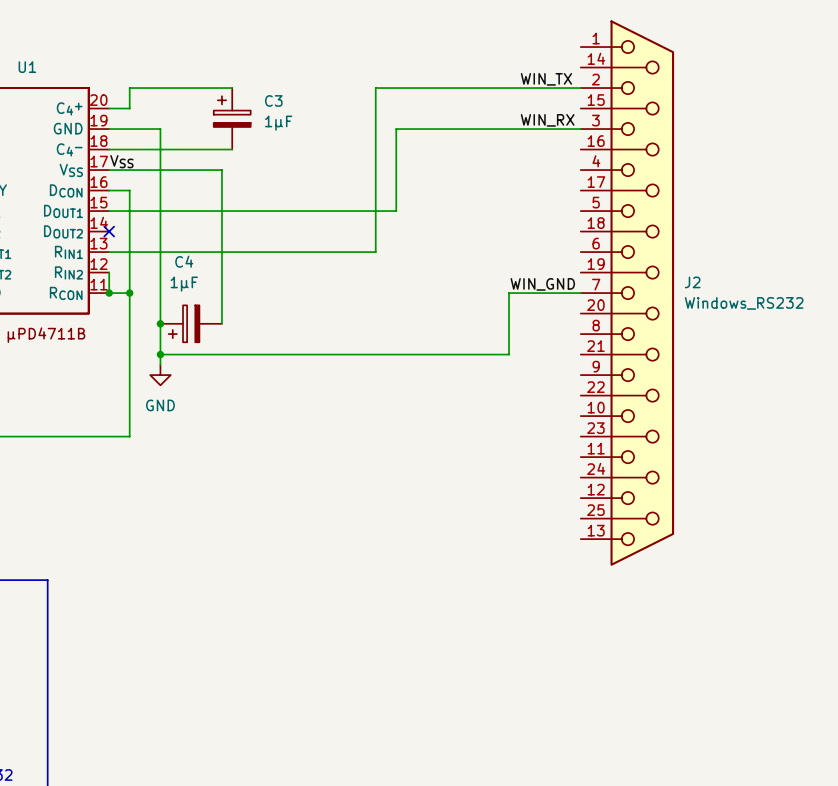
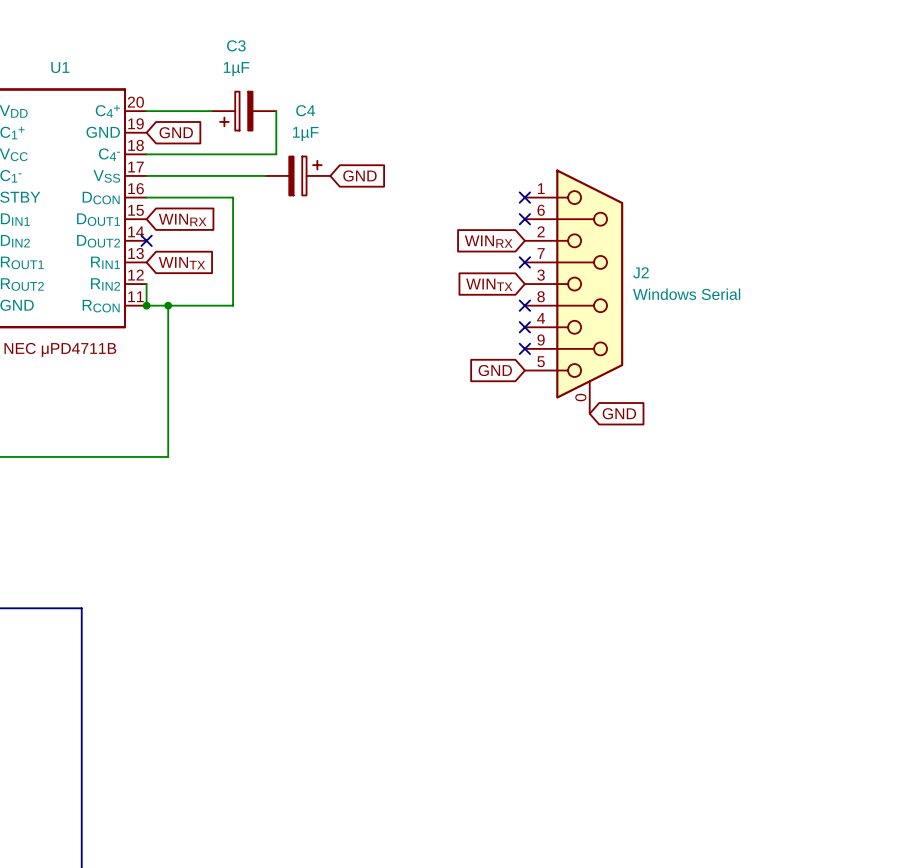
J2 symbol: [580, 20, 675, 566] -> [524, 169, 624, 414]
label: WIN_TX (546, 79) -> none
wire: (232, 88) (129, 88) (129, 108) -> (211, 111) (168, 111)
wire: (580, 88) (375, 88) (375, 252) (109, 252) -> none
C3 name position: C3 (273, 100) -> C3 (236, 45)
C3 rotation: 0° (232, 111) -> 90° counterclockwise (236, 111)
label: WIN_RX (547, 120) -> none
wire: (109, 129) (160, 129) (160, 364) -> none
global label: none -> GND (176, 132)
wire: (580, 129) (396, 129) (396, 211) (109, 211) -> none
label: VSS (121, 161) -> none
wire: (221, 170) (221, 323) -> none
global label: none -> GND (359, 175)
wire: (129, 190) (129, 293) -> (168, 197) (233, 197) (233, 305) (168, 305)
no-connect mark: none -> (524, 197)
global label: none -> WINRX (182, 220)
no-connect mark: none -> (524, 219)
global label: none -> WINRX (488, 241)
global label: none -> WINTX (181, 263)
no-connect mark: none -> (524, 262)
global label: none -> WINTX (489, 284)
label: WIN_GND (542, 284) -> none
no-connect mark: none -> (524, 305)
wire: (580, 293) (509, 293) (509, 354) (160, 354) -> none
J2 value: Windows_RS232 (744, 303) -> Windows Serial (686, 294)
no-connect mark: none -> (524, 327)
junction: (160, 323) -> none
C4 rotation: 0° (184, 323) -> 180° (305, 175)
C4 position: (191, 323) -> (297, 175)
no-connect mark: none -> (524, 348)
junction: (160, 354) -> none
global label: none -> GND (495, 370)
power symbol: GND (160, 375) -> none
global label: none -> GND (619, 413)

